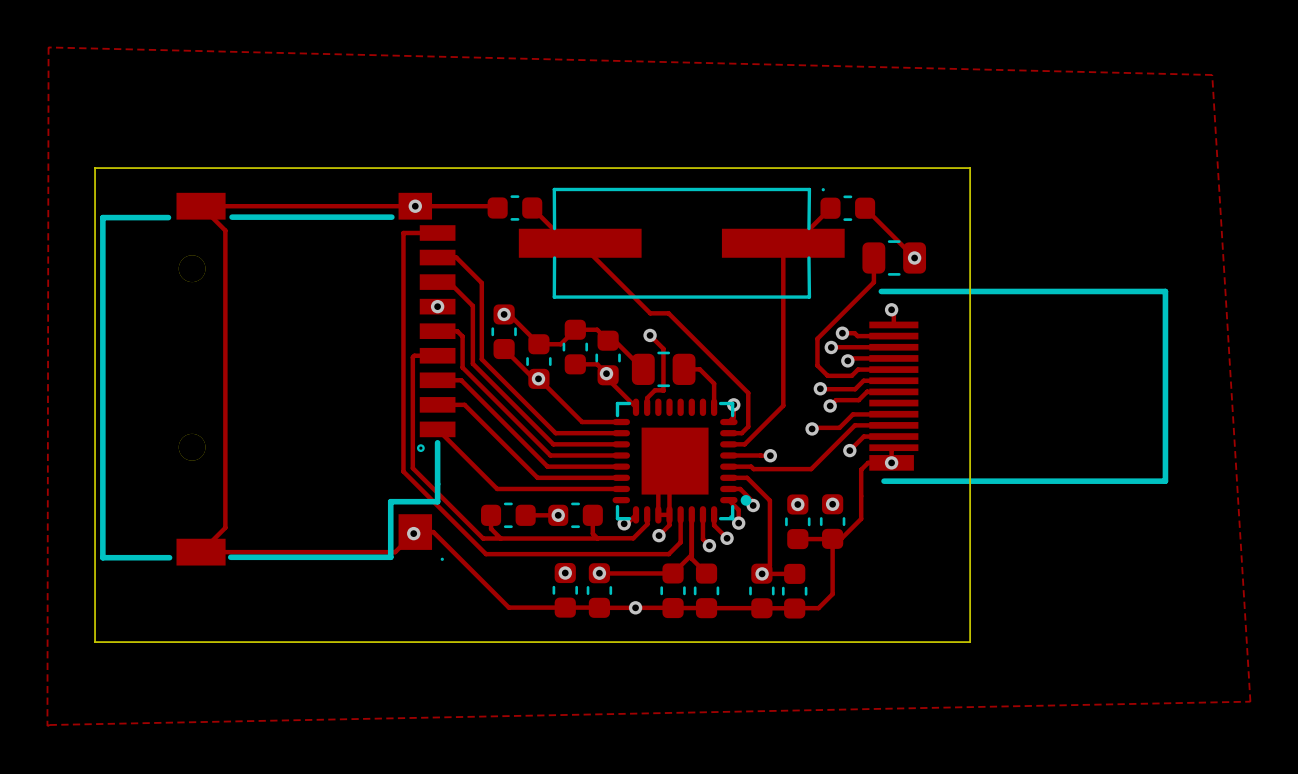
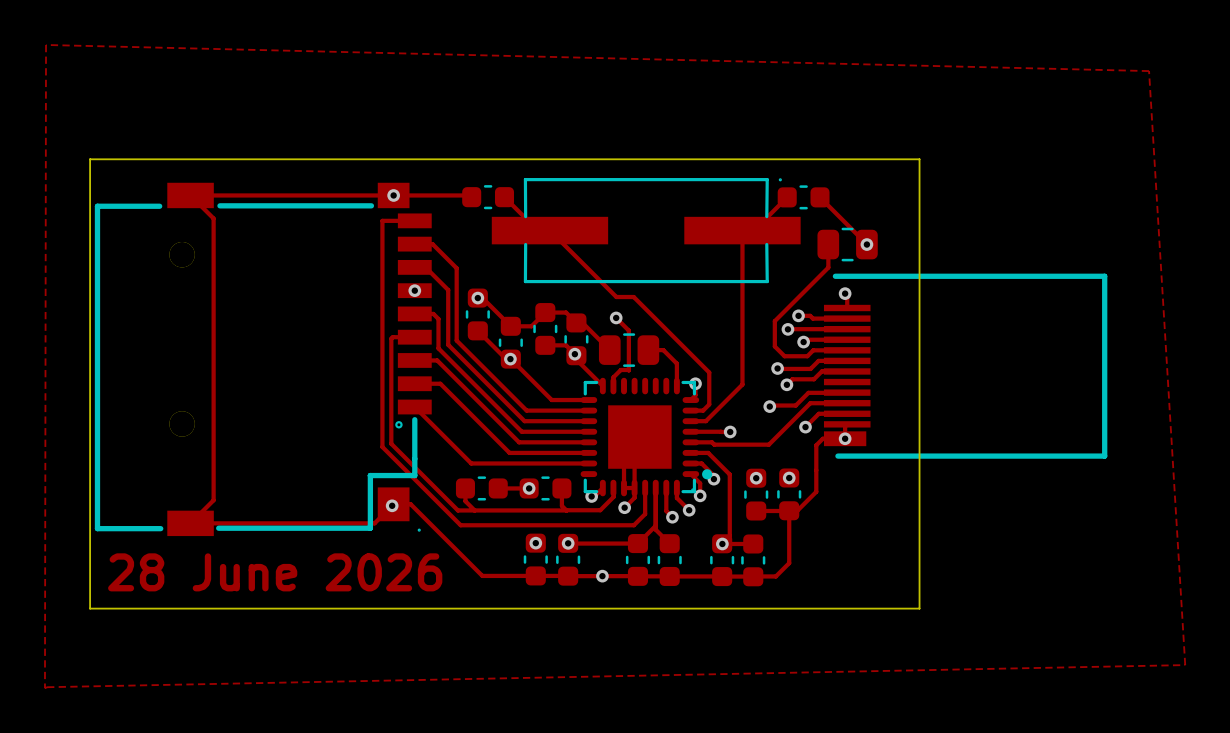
text: none -> 28 June 2026 (275, 572)

